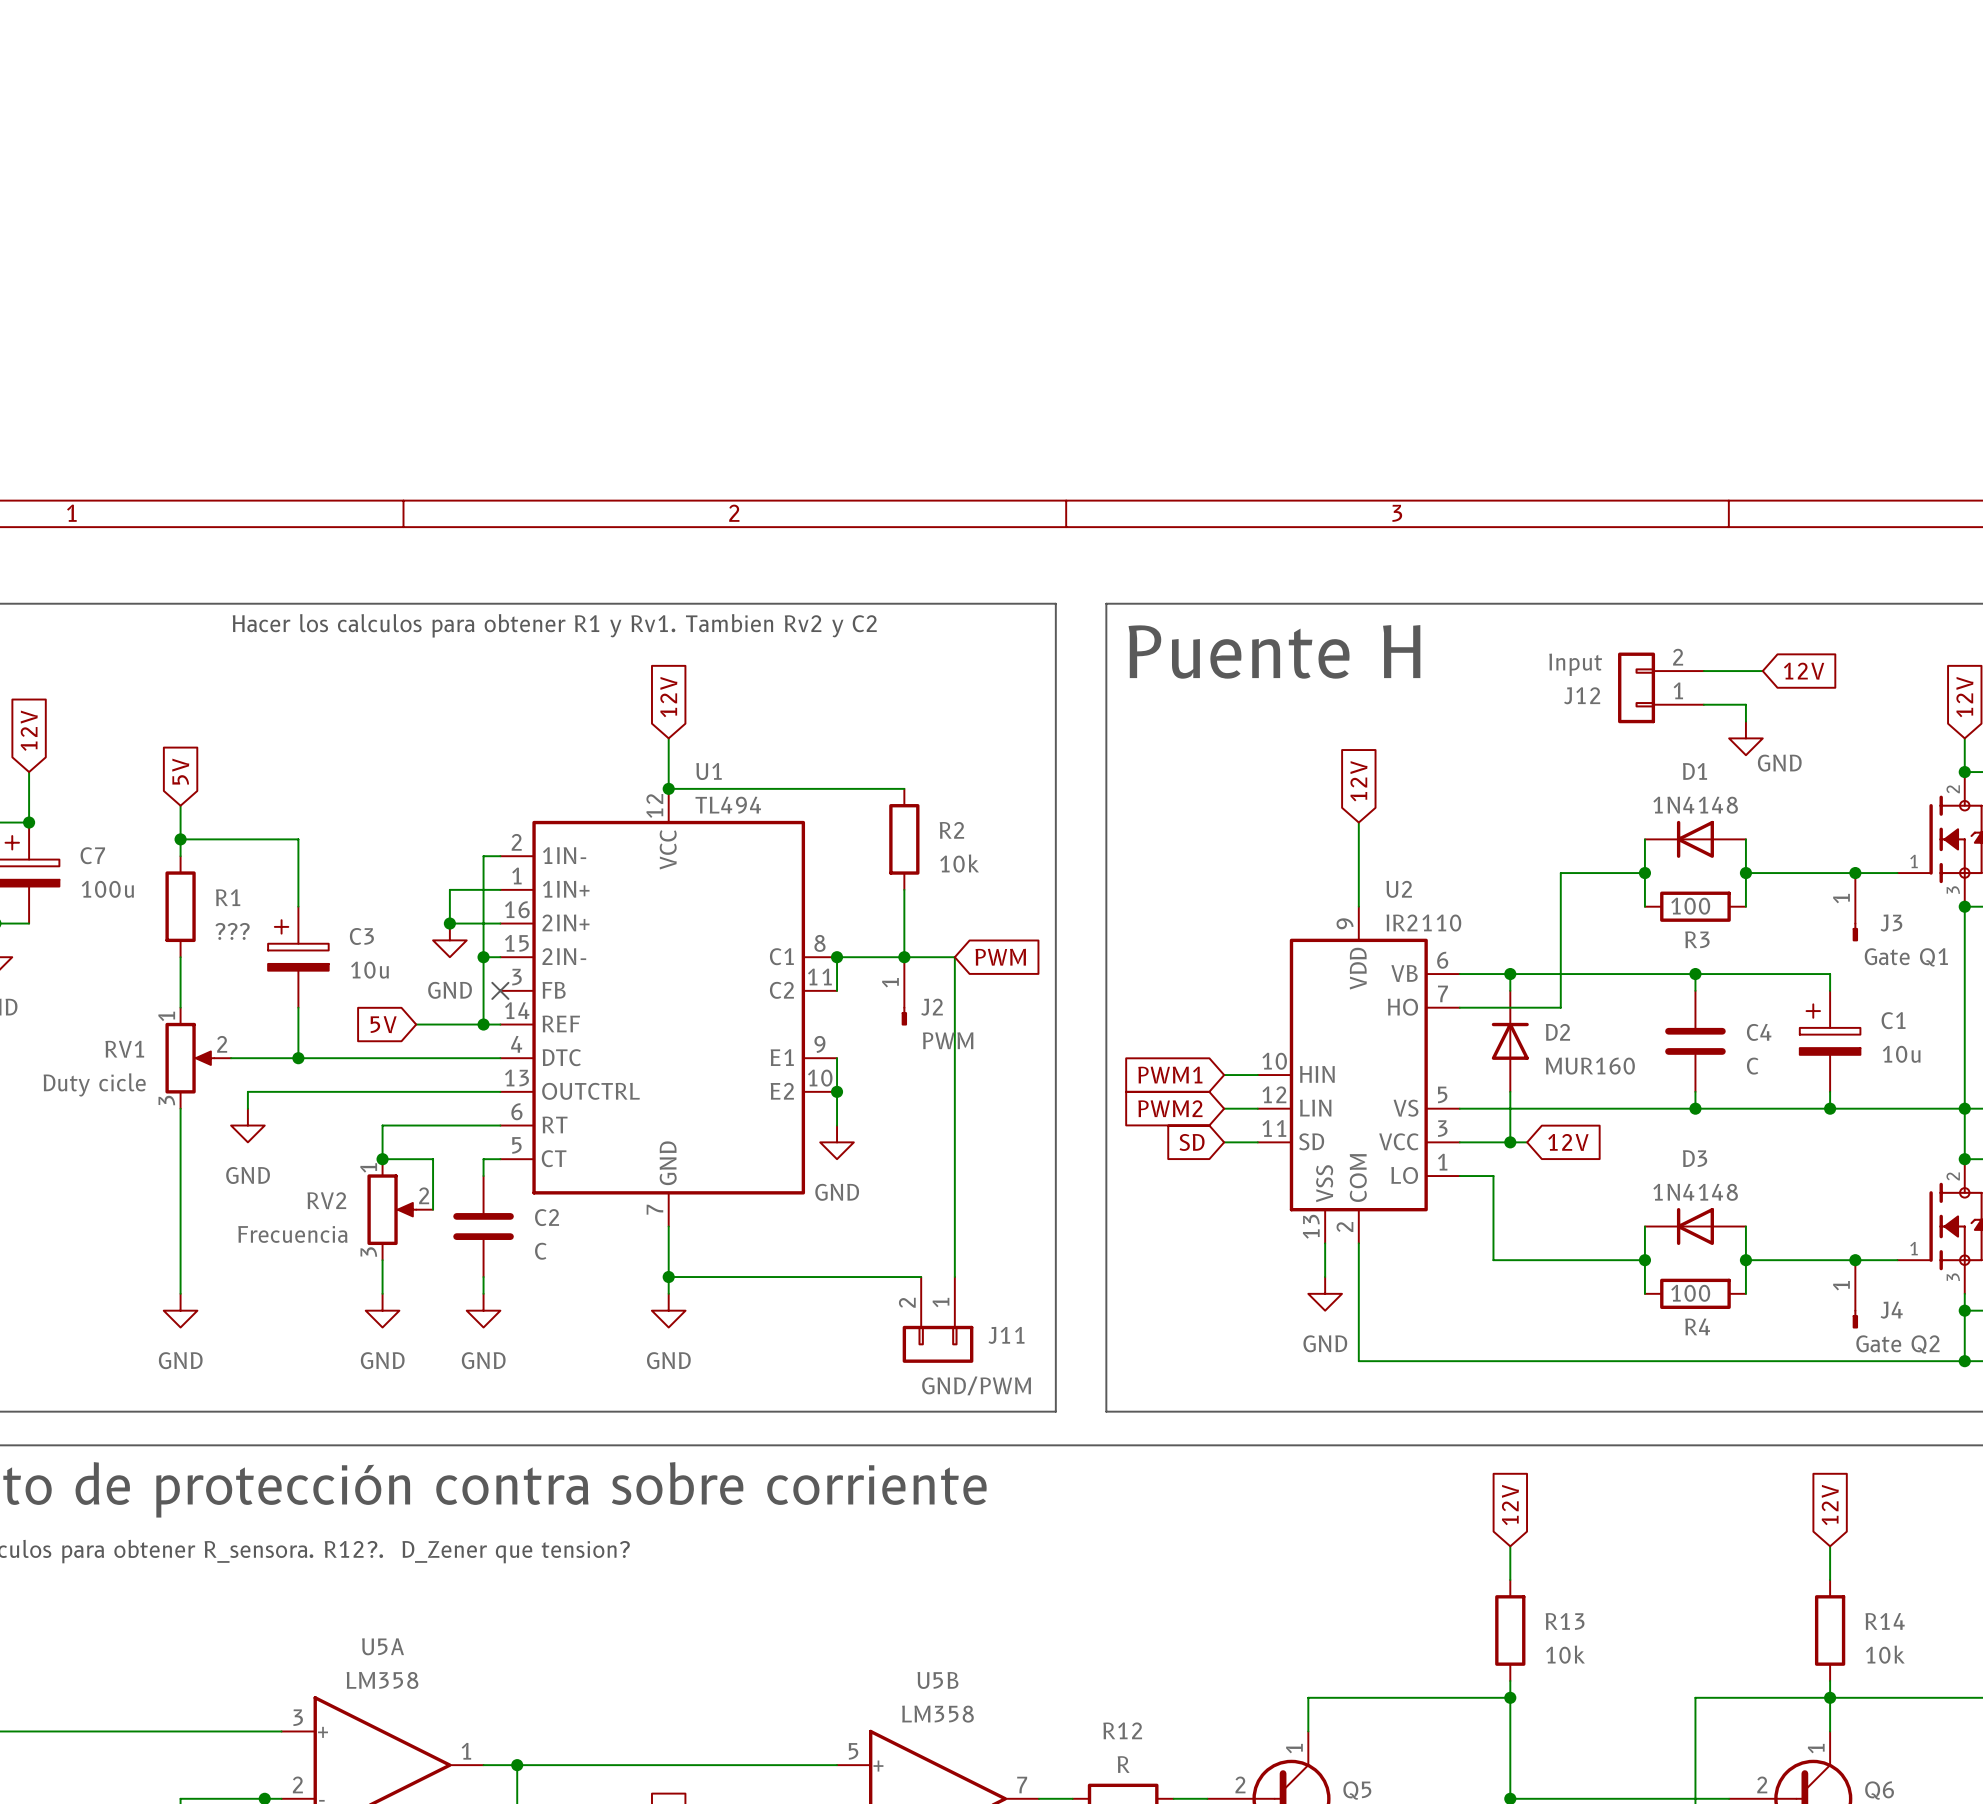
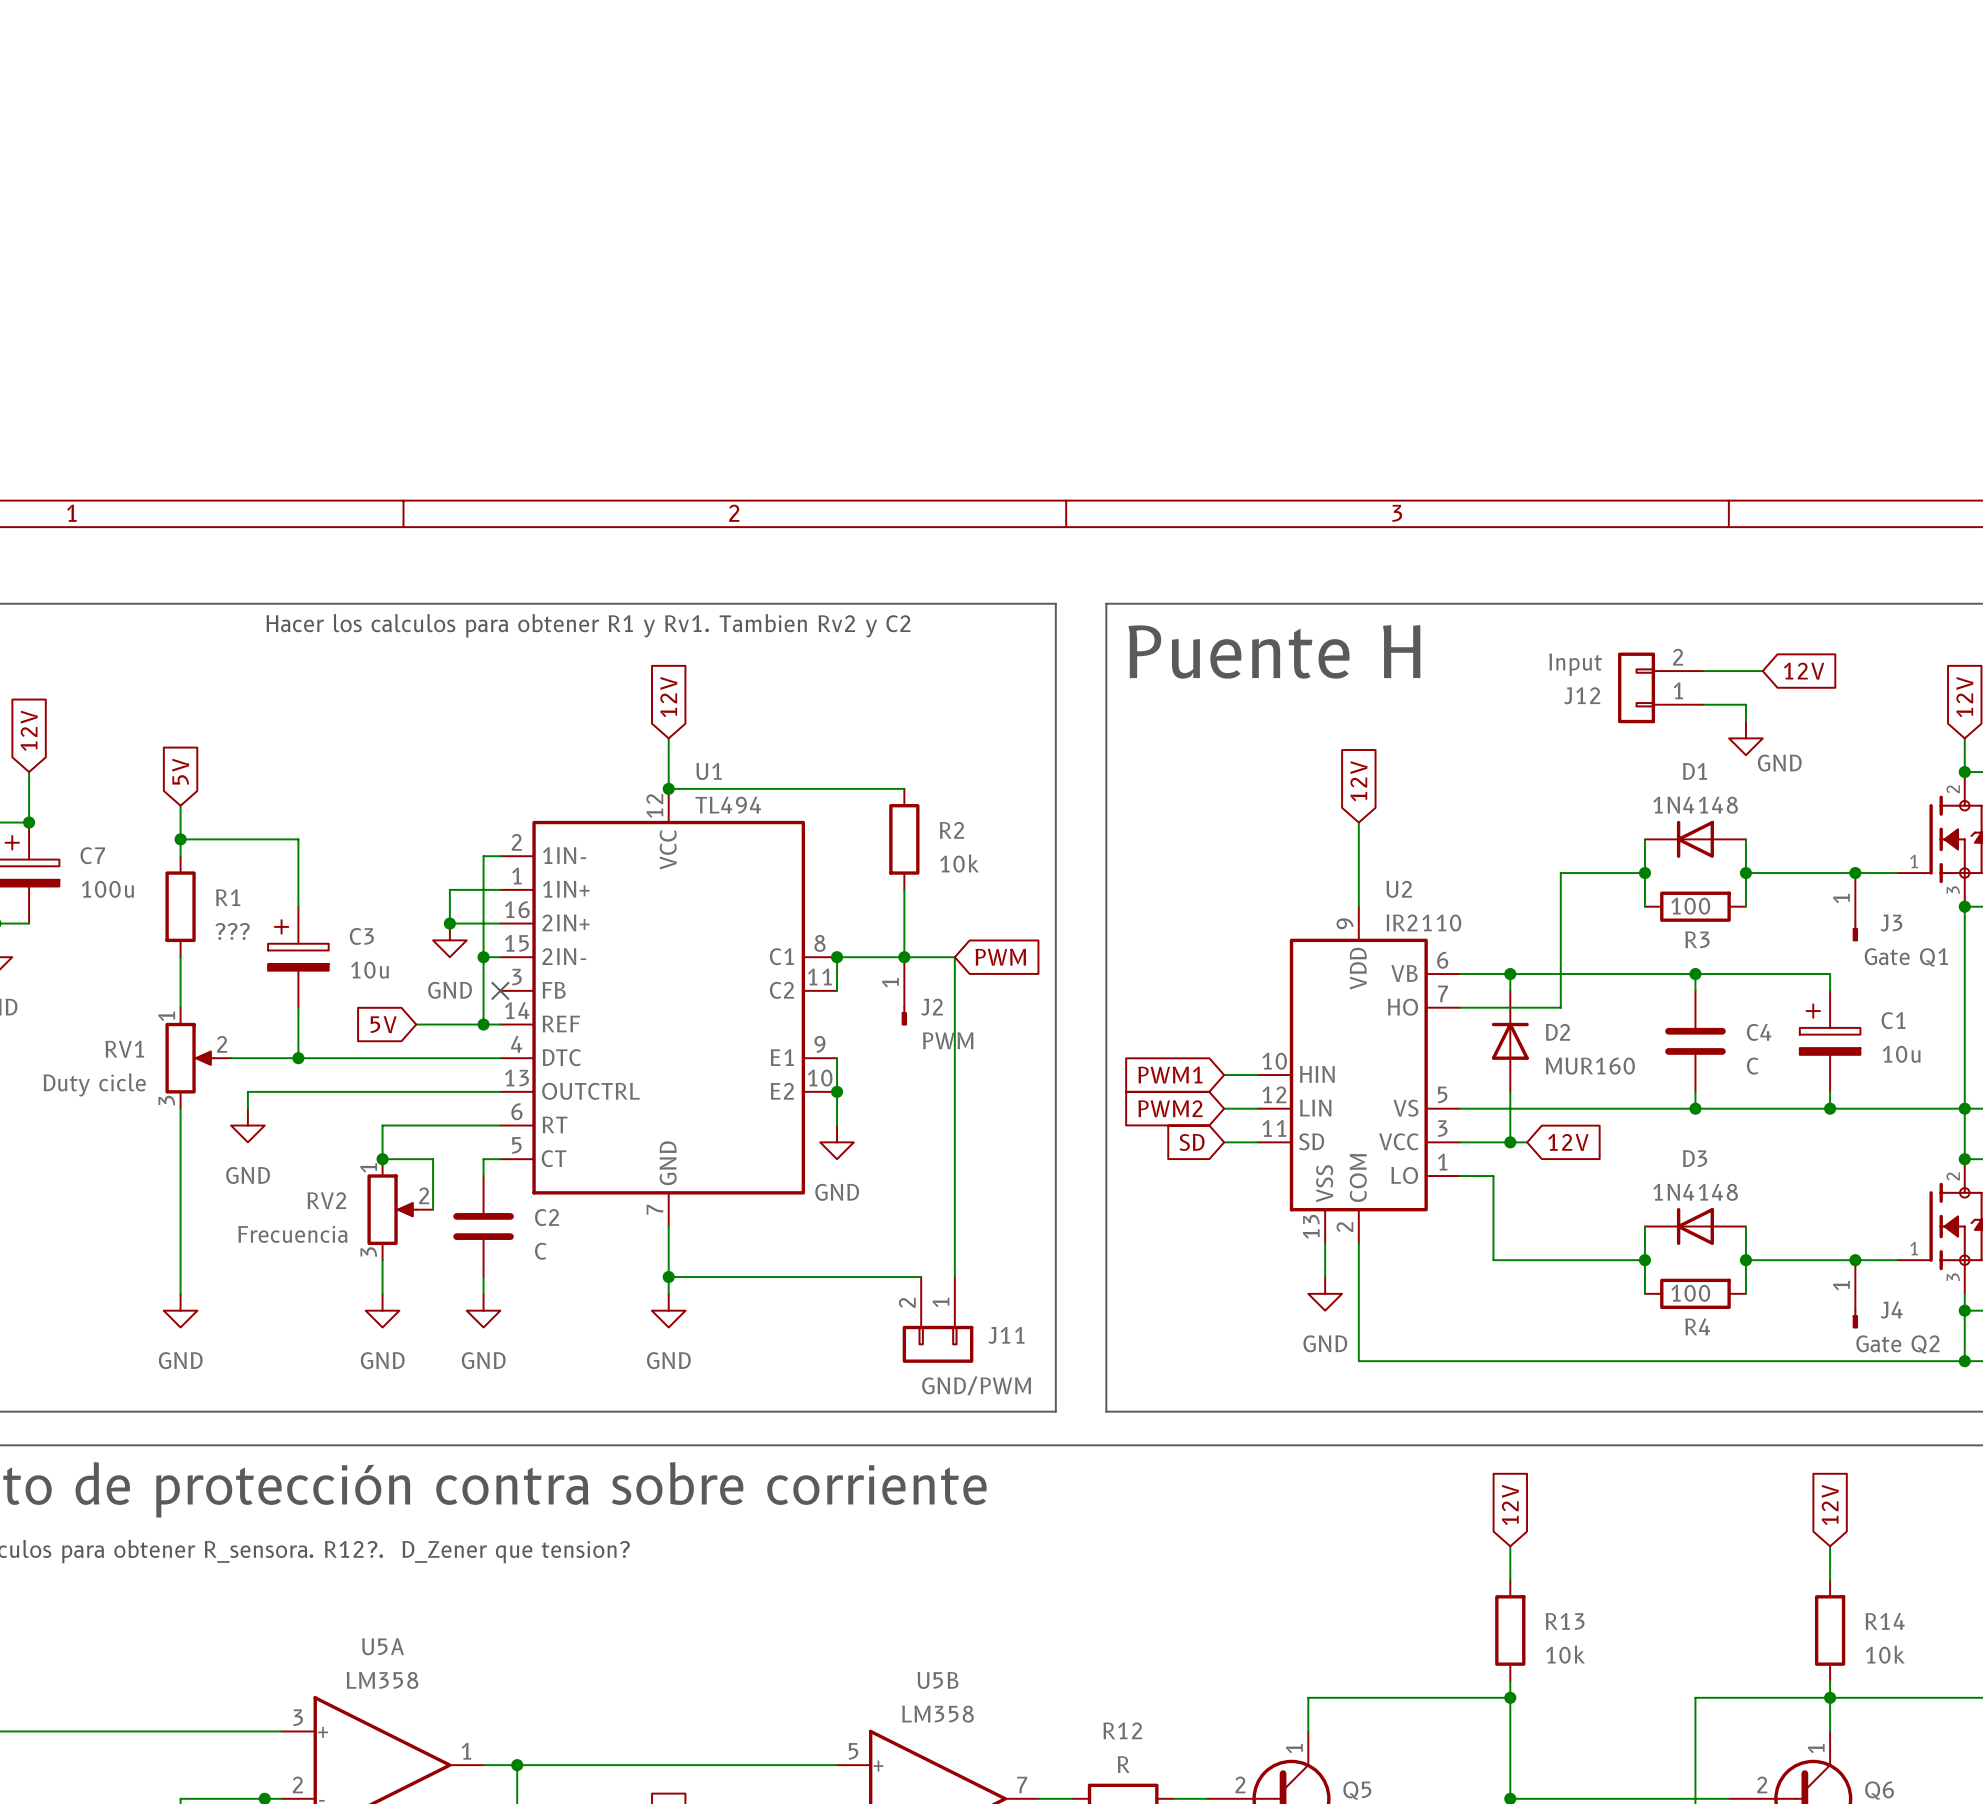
text position: Hacer los calculos para obtener R1 y Rv1. Tambien Rv2 y C2 (554, 625) -> Hacer los calculos para obtener R1 y Rv1. Tambien Rv2 y C2 (588, 625)

